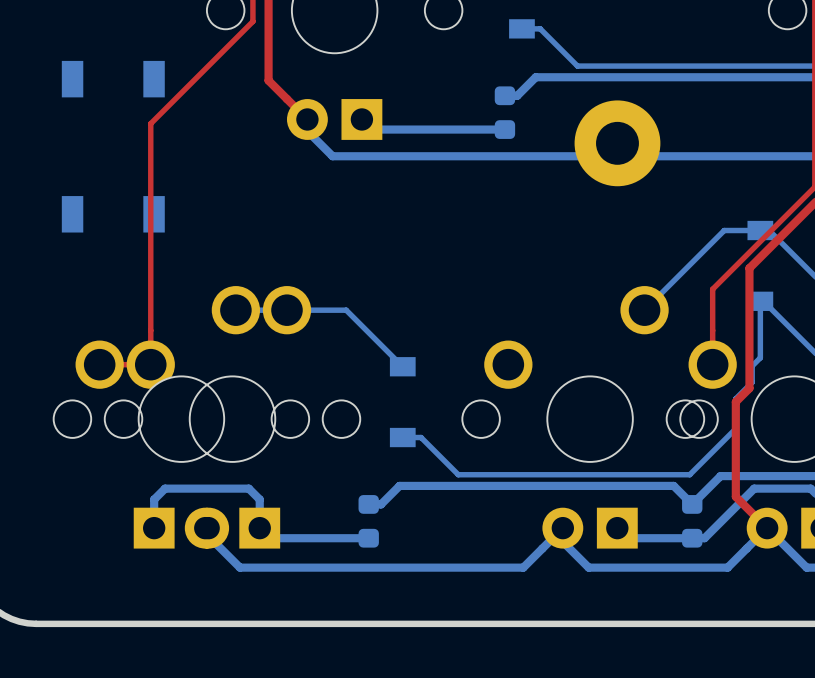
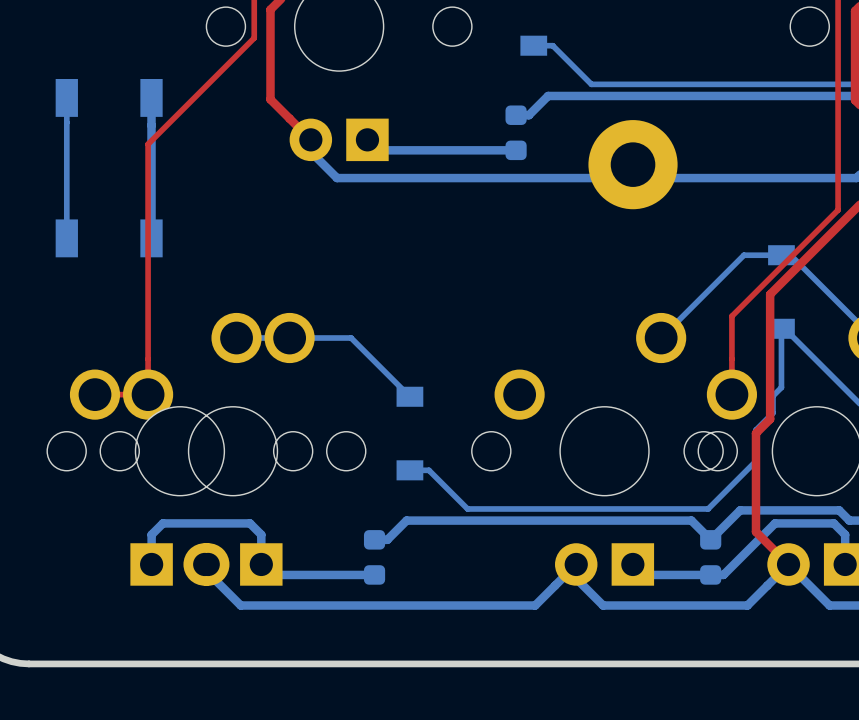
bottom track: none -> (66, 97) (66, 238)
bottom track: none -> (151, 97) (151, 238)

